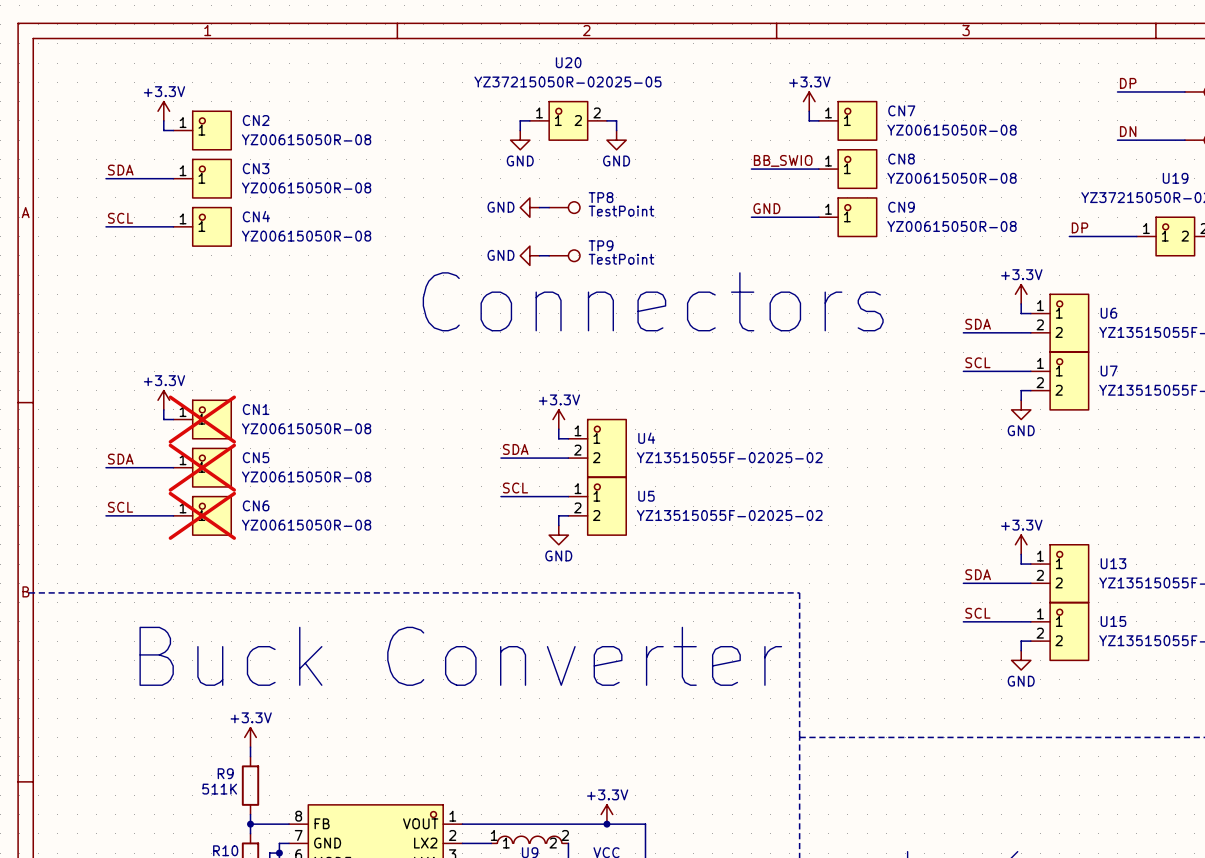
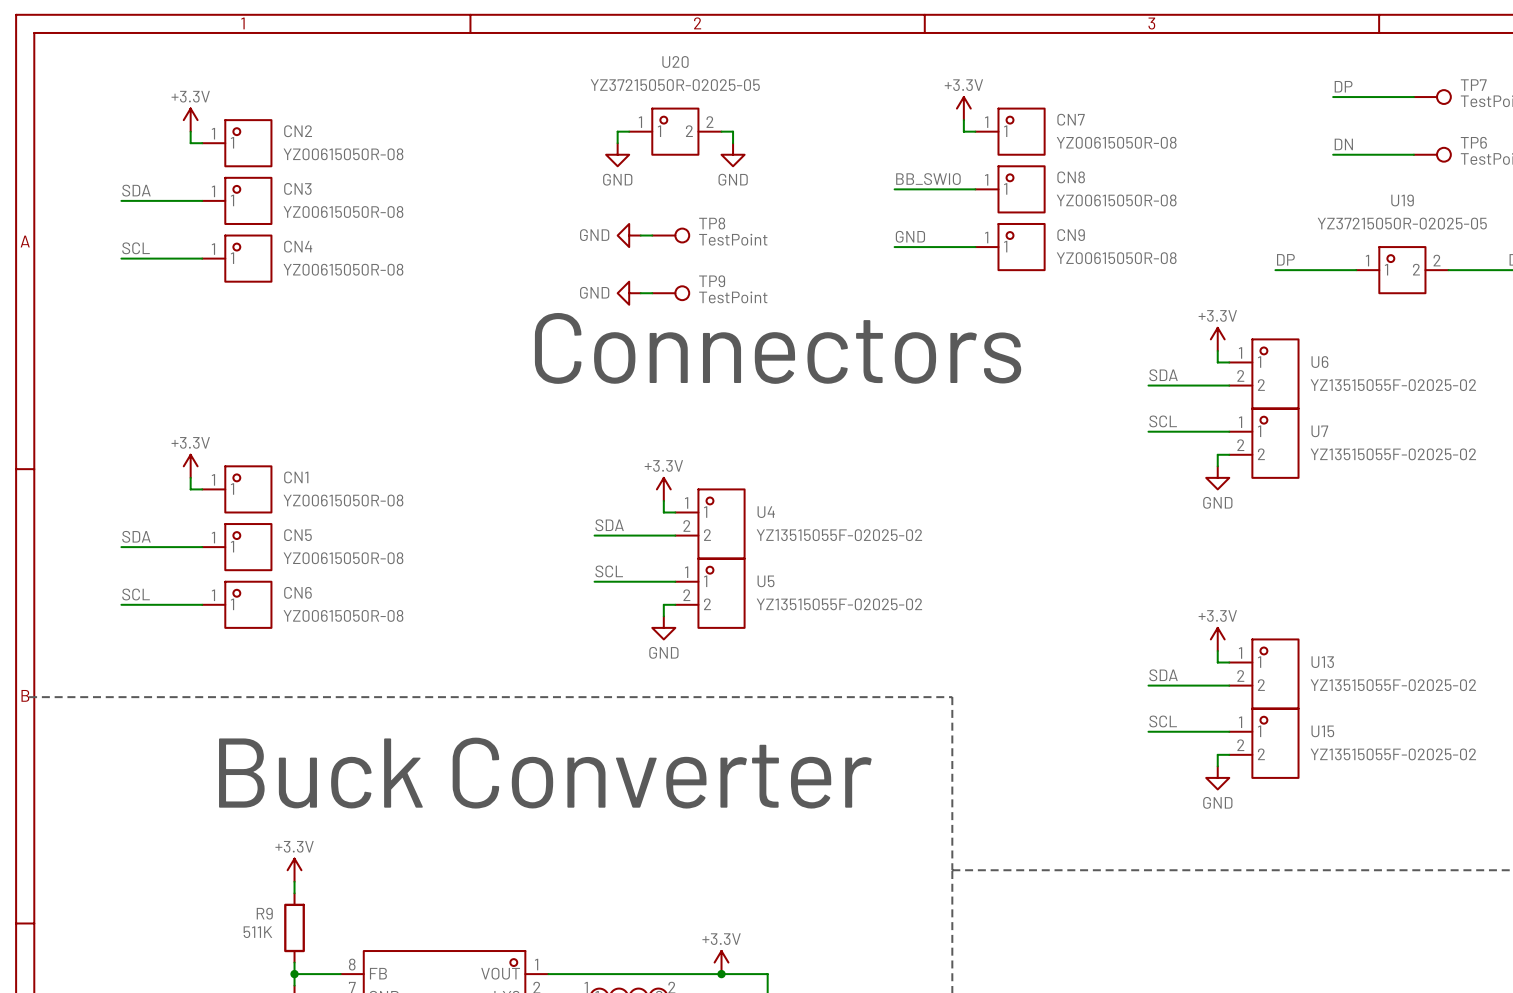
CN1 do-not-place cross: (202, 419) -> none
CN5 do-not-place cross: (202, 467) -> none
CN6 do-not-place cross: (202, 515) -> none

